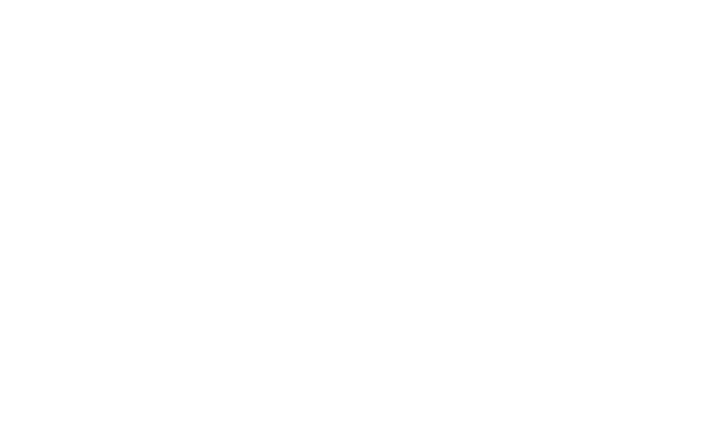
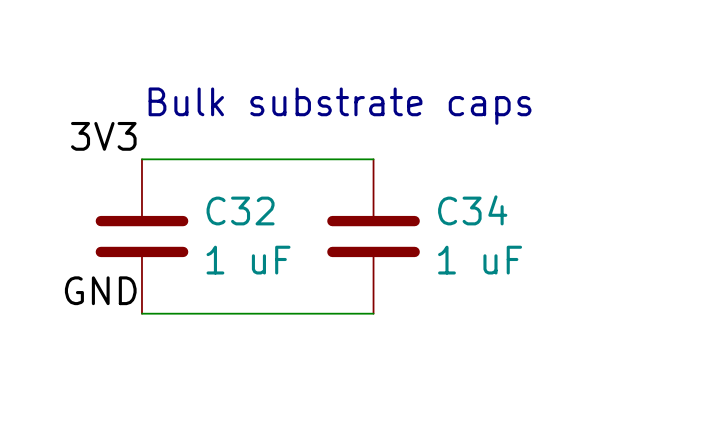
text: none -> Bulk substrate caps (340, 106)
label: none -> 3V3 (103, 136)
wire: none -> (141, 159) (373, 159)
C32: none -> 1 uF (141, 236)
C34: none -> 1 uF (373, 236)
label: none -> GND (100, 290)
wire: none -> (141, 313) (373, 313)

